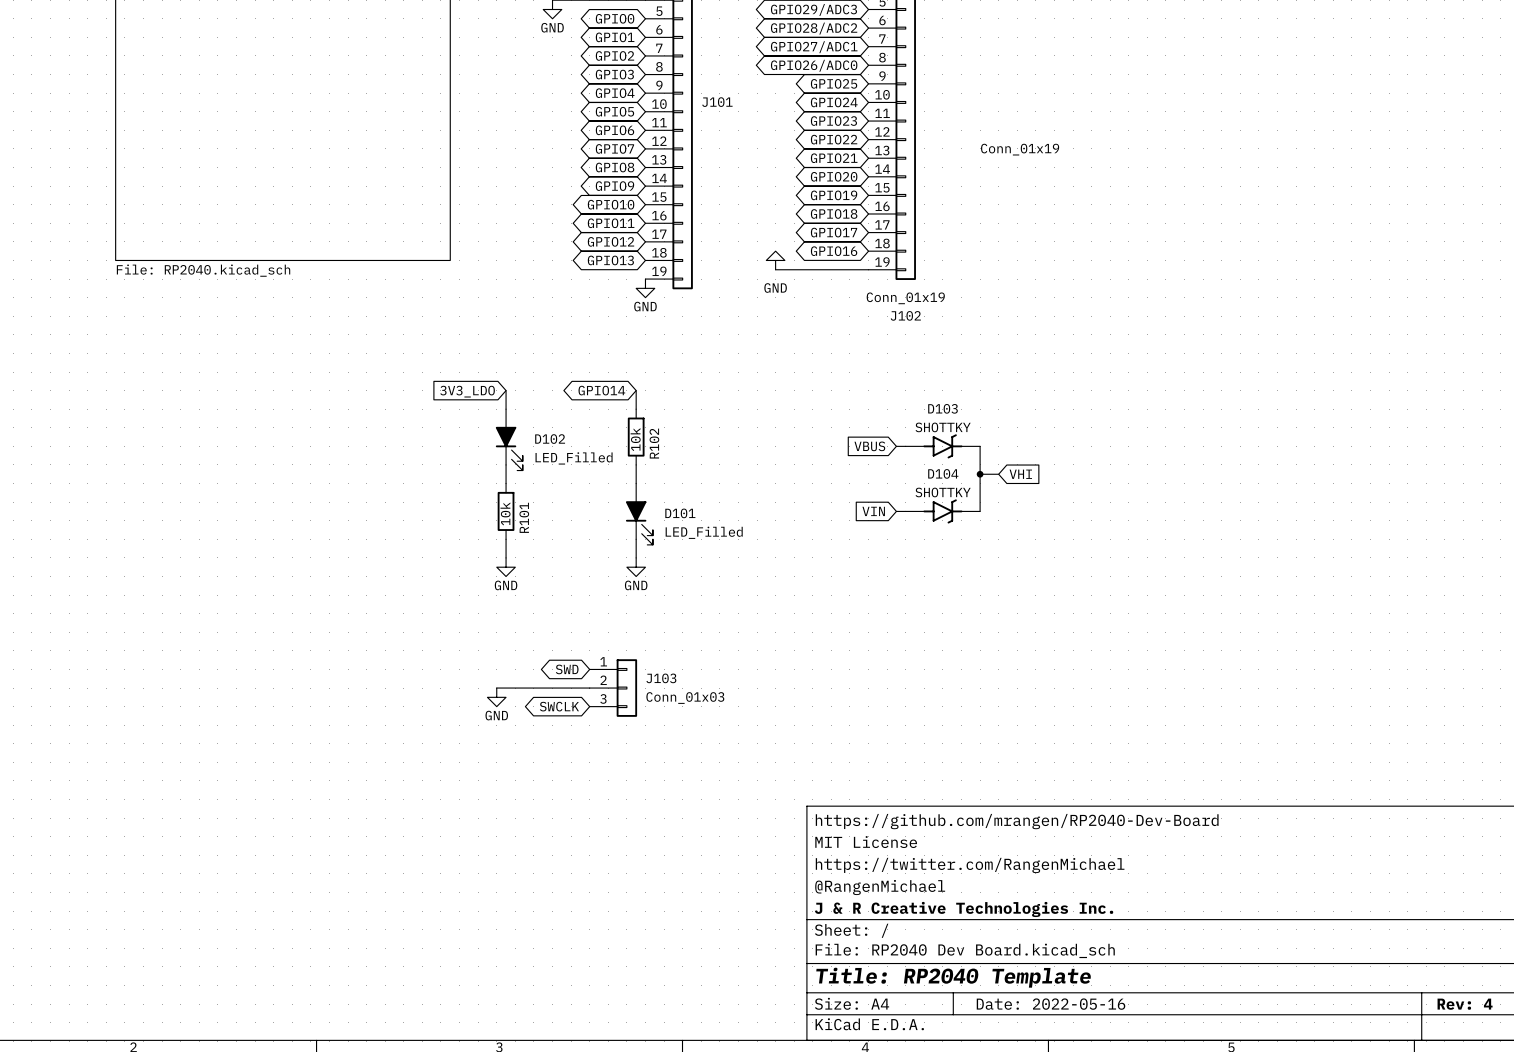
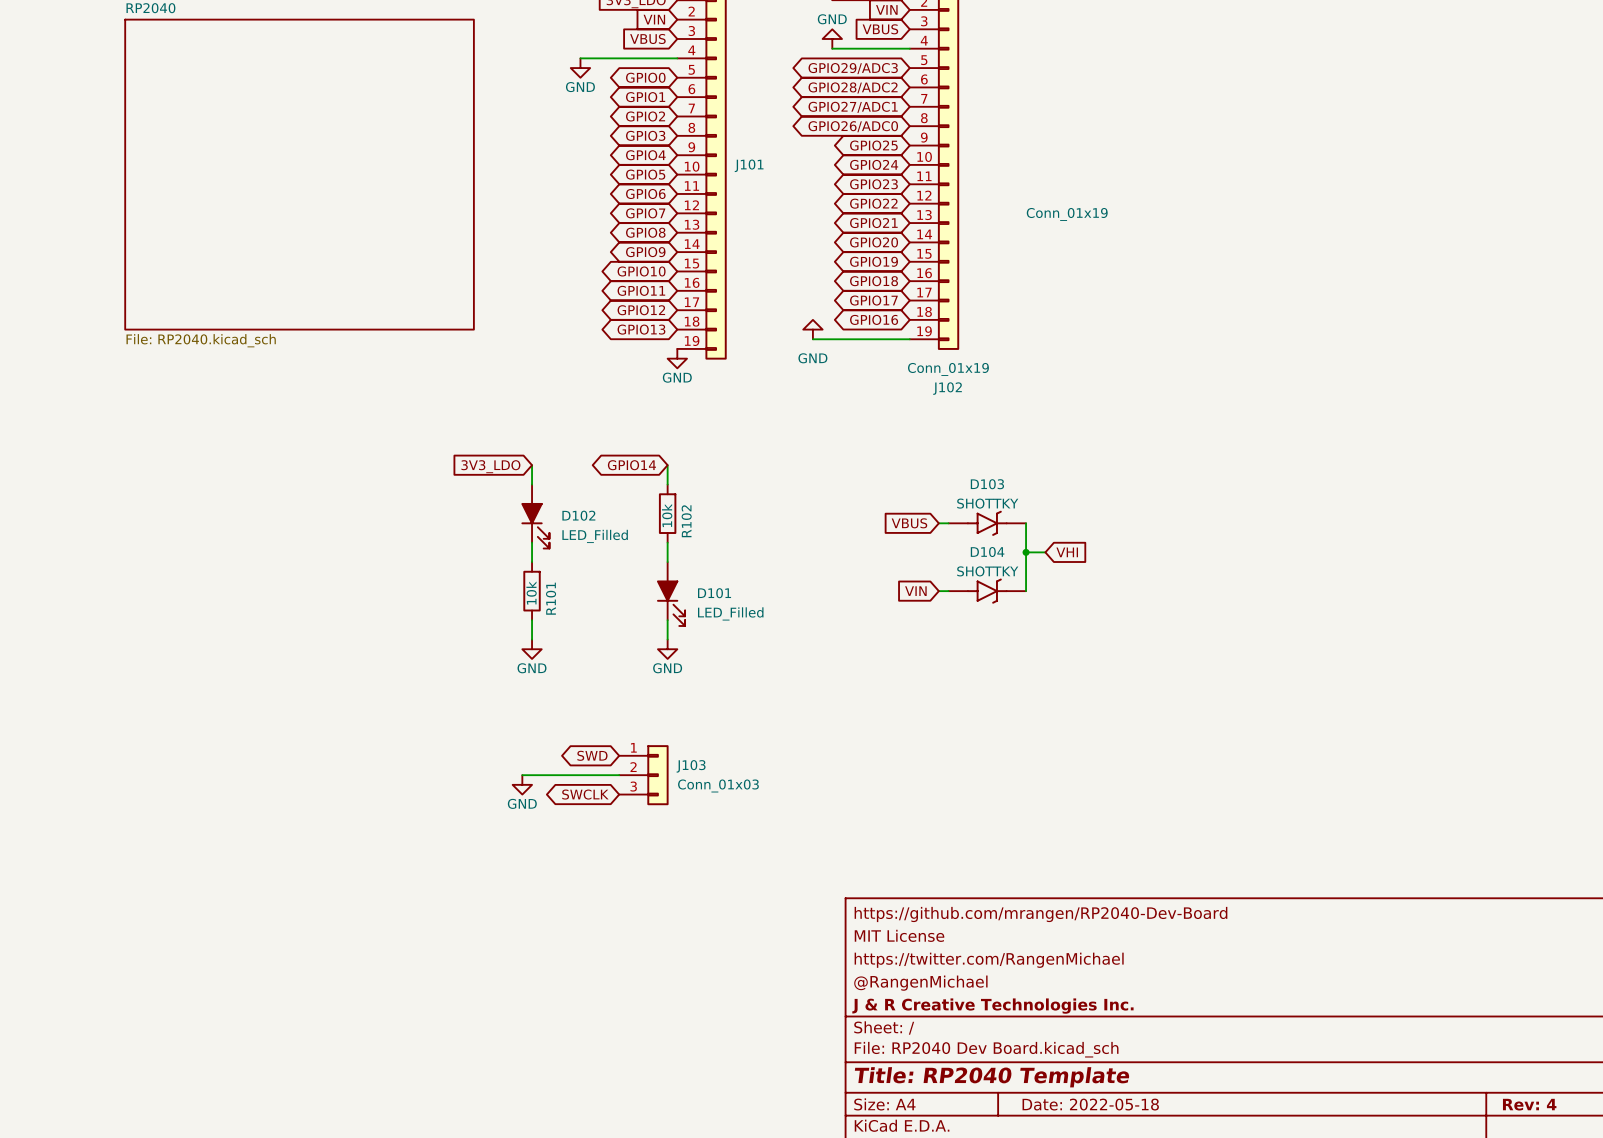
title block: Date: 2022-05-16 (1051, 1004) -> Date: 2022-05-18 (1090, 1104)

